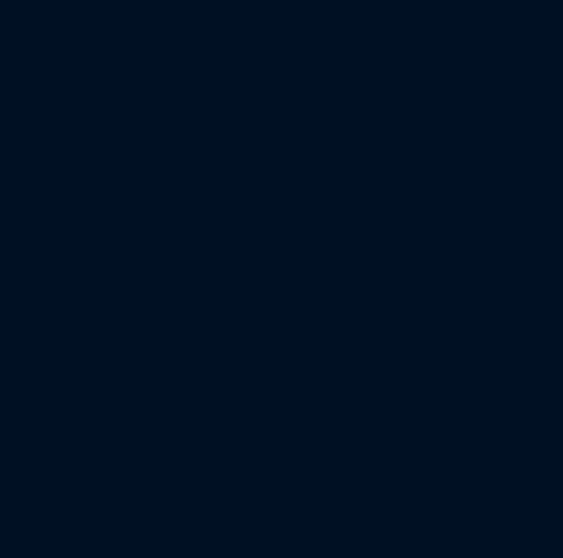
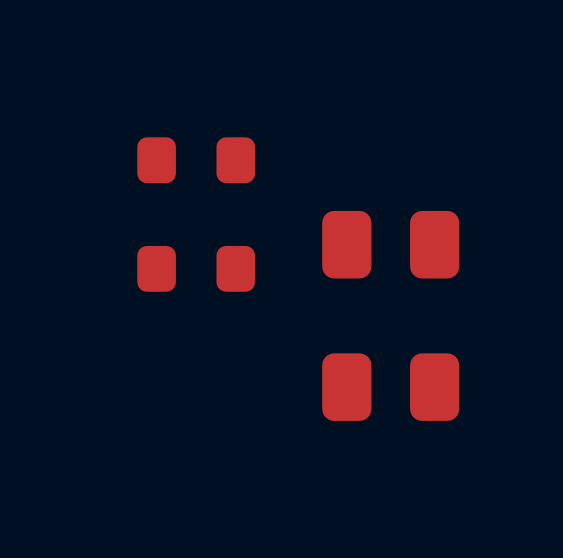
part: none -> (196, 160)
part: none -> (390, 244)
part: none -> (196, 268)
part: none -> (390, 387)

